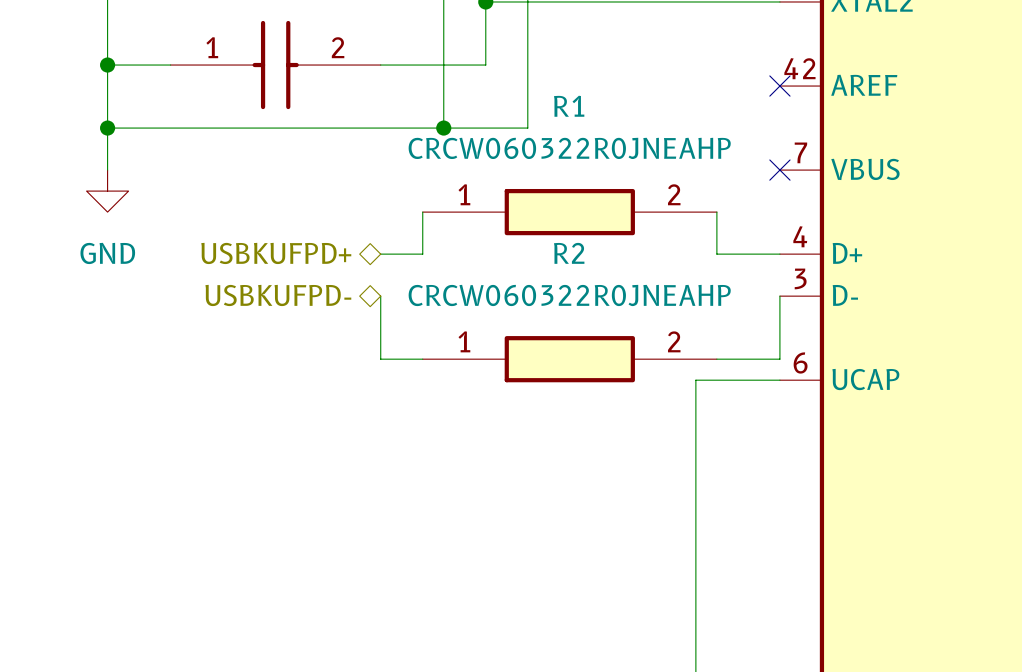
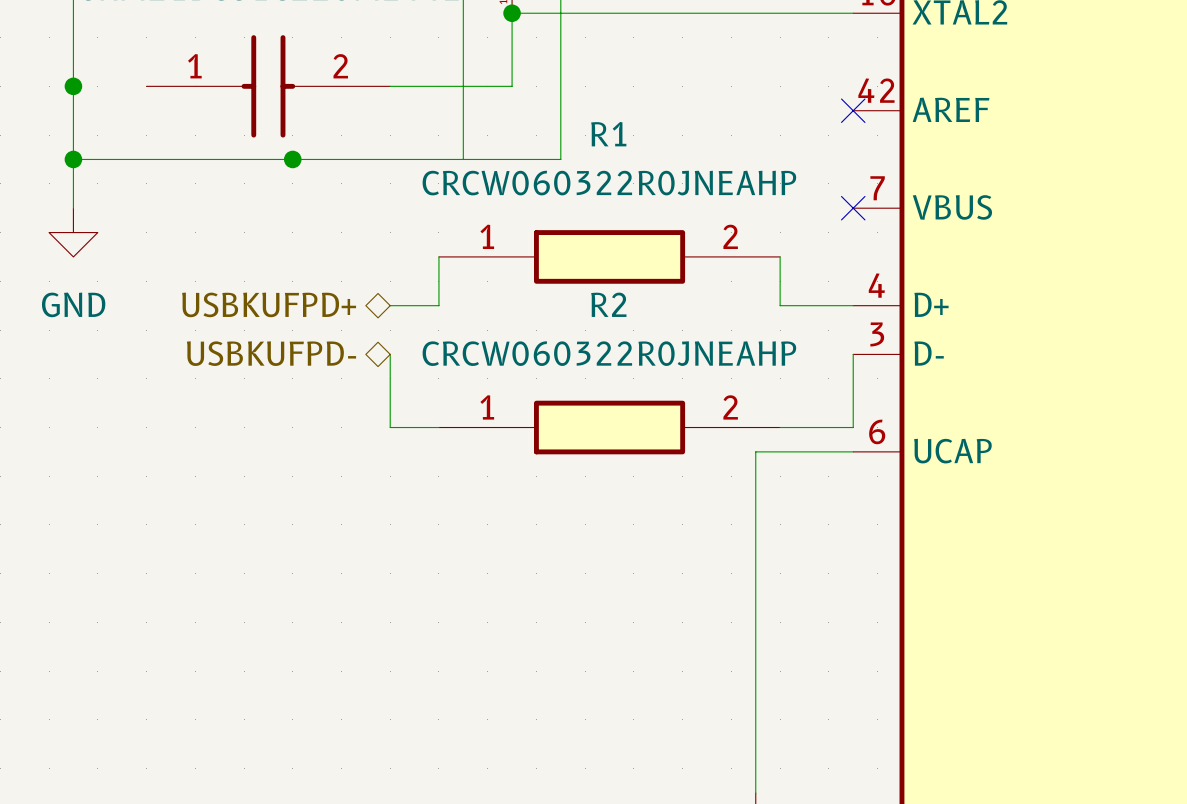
wire: (107, 65) (170, 65) -> none
junction: none -> (292, 159)
junction: (443, 128) -> none

